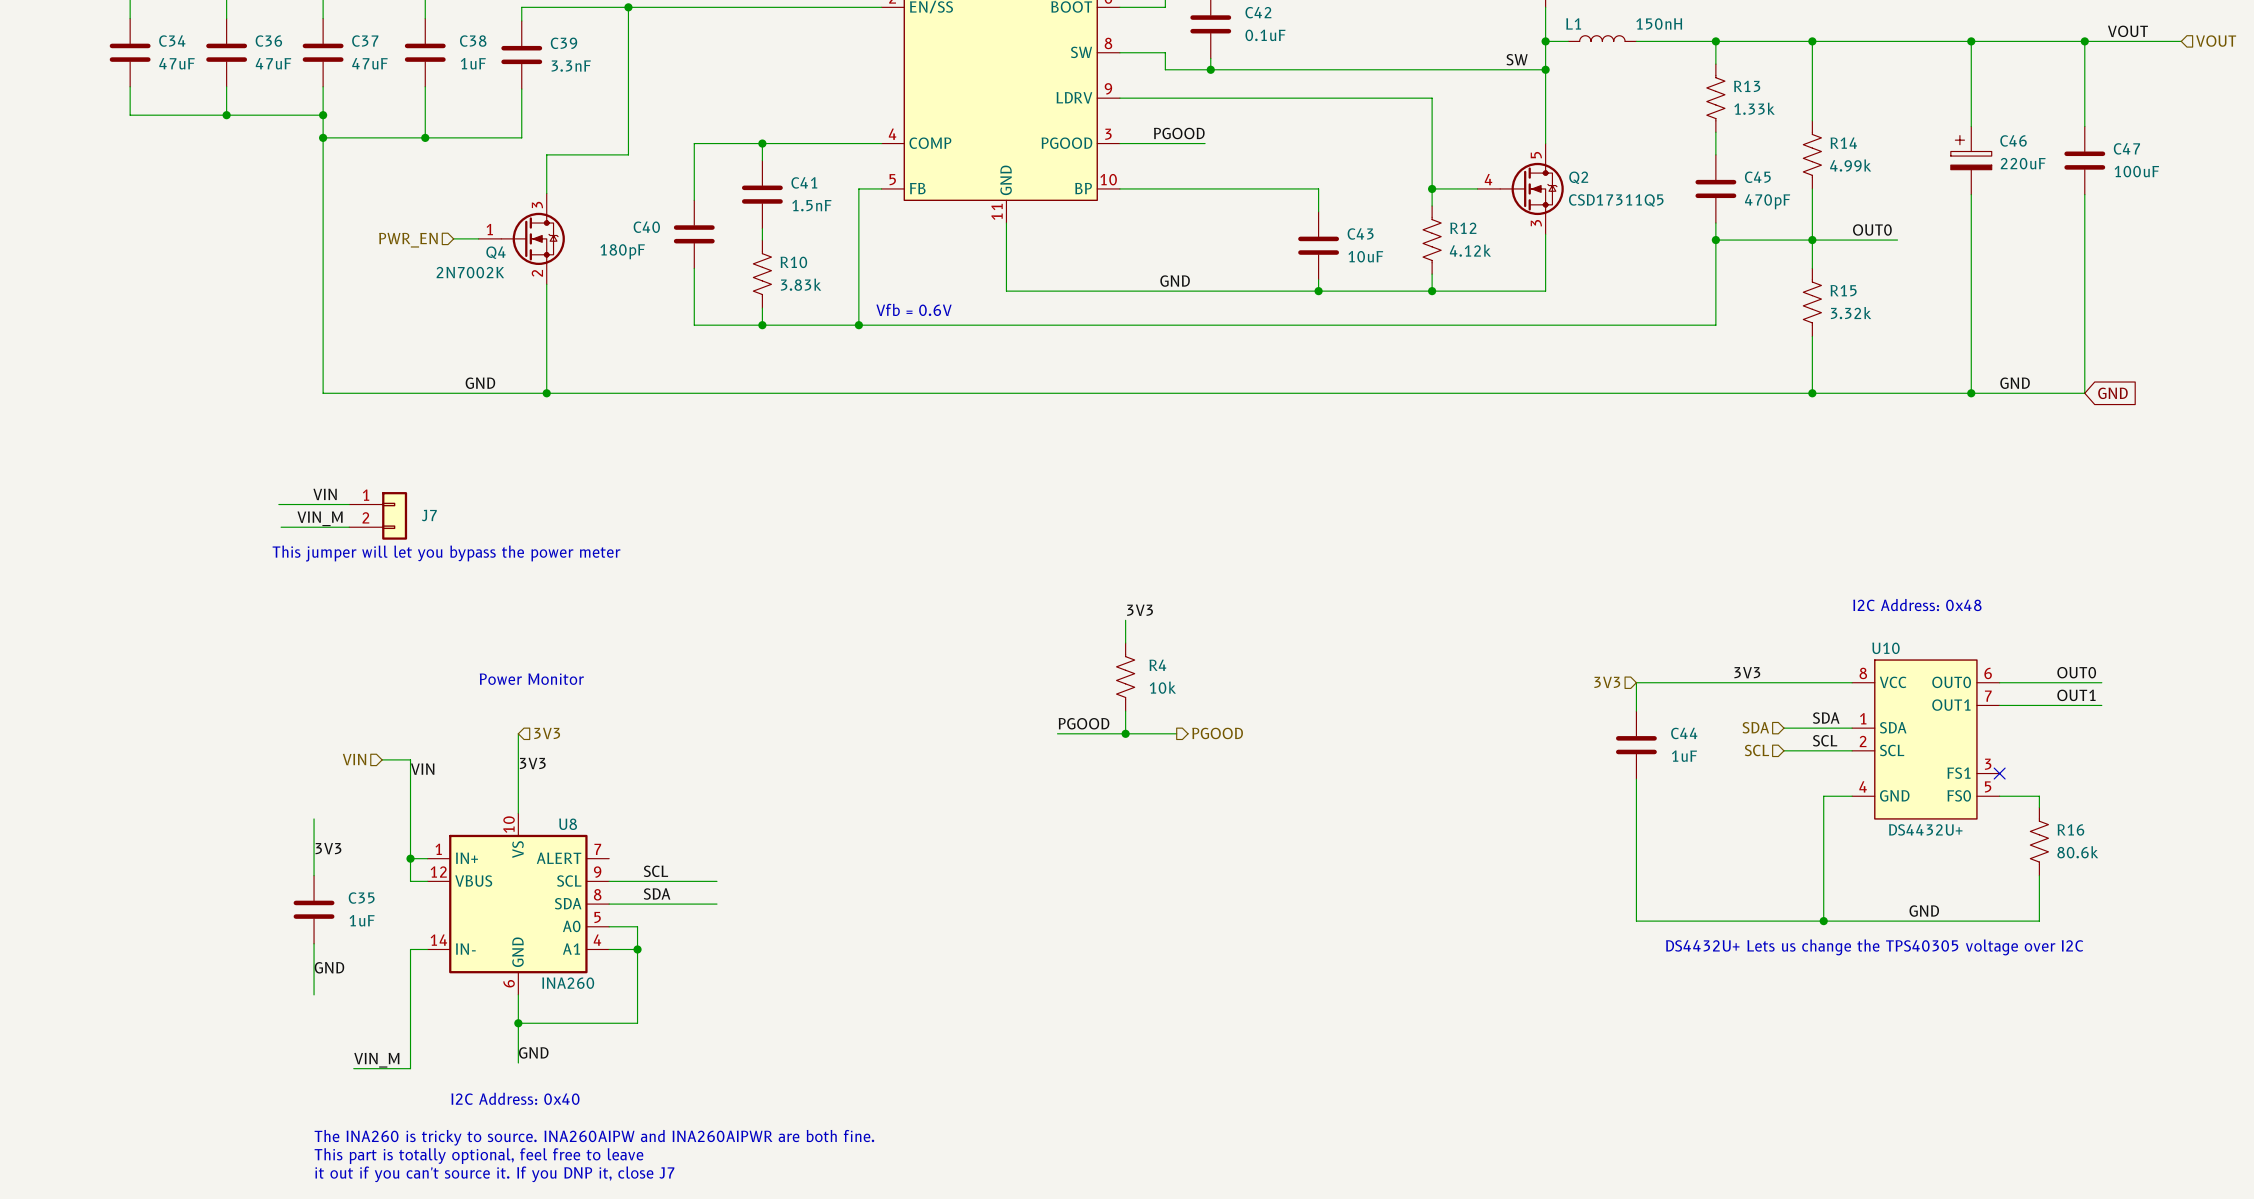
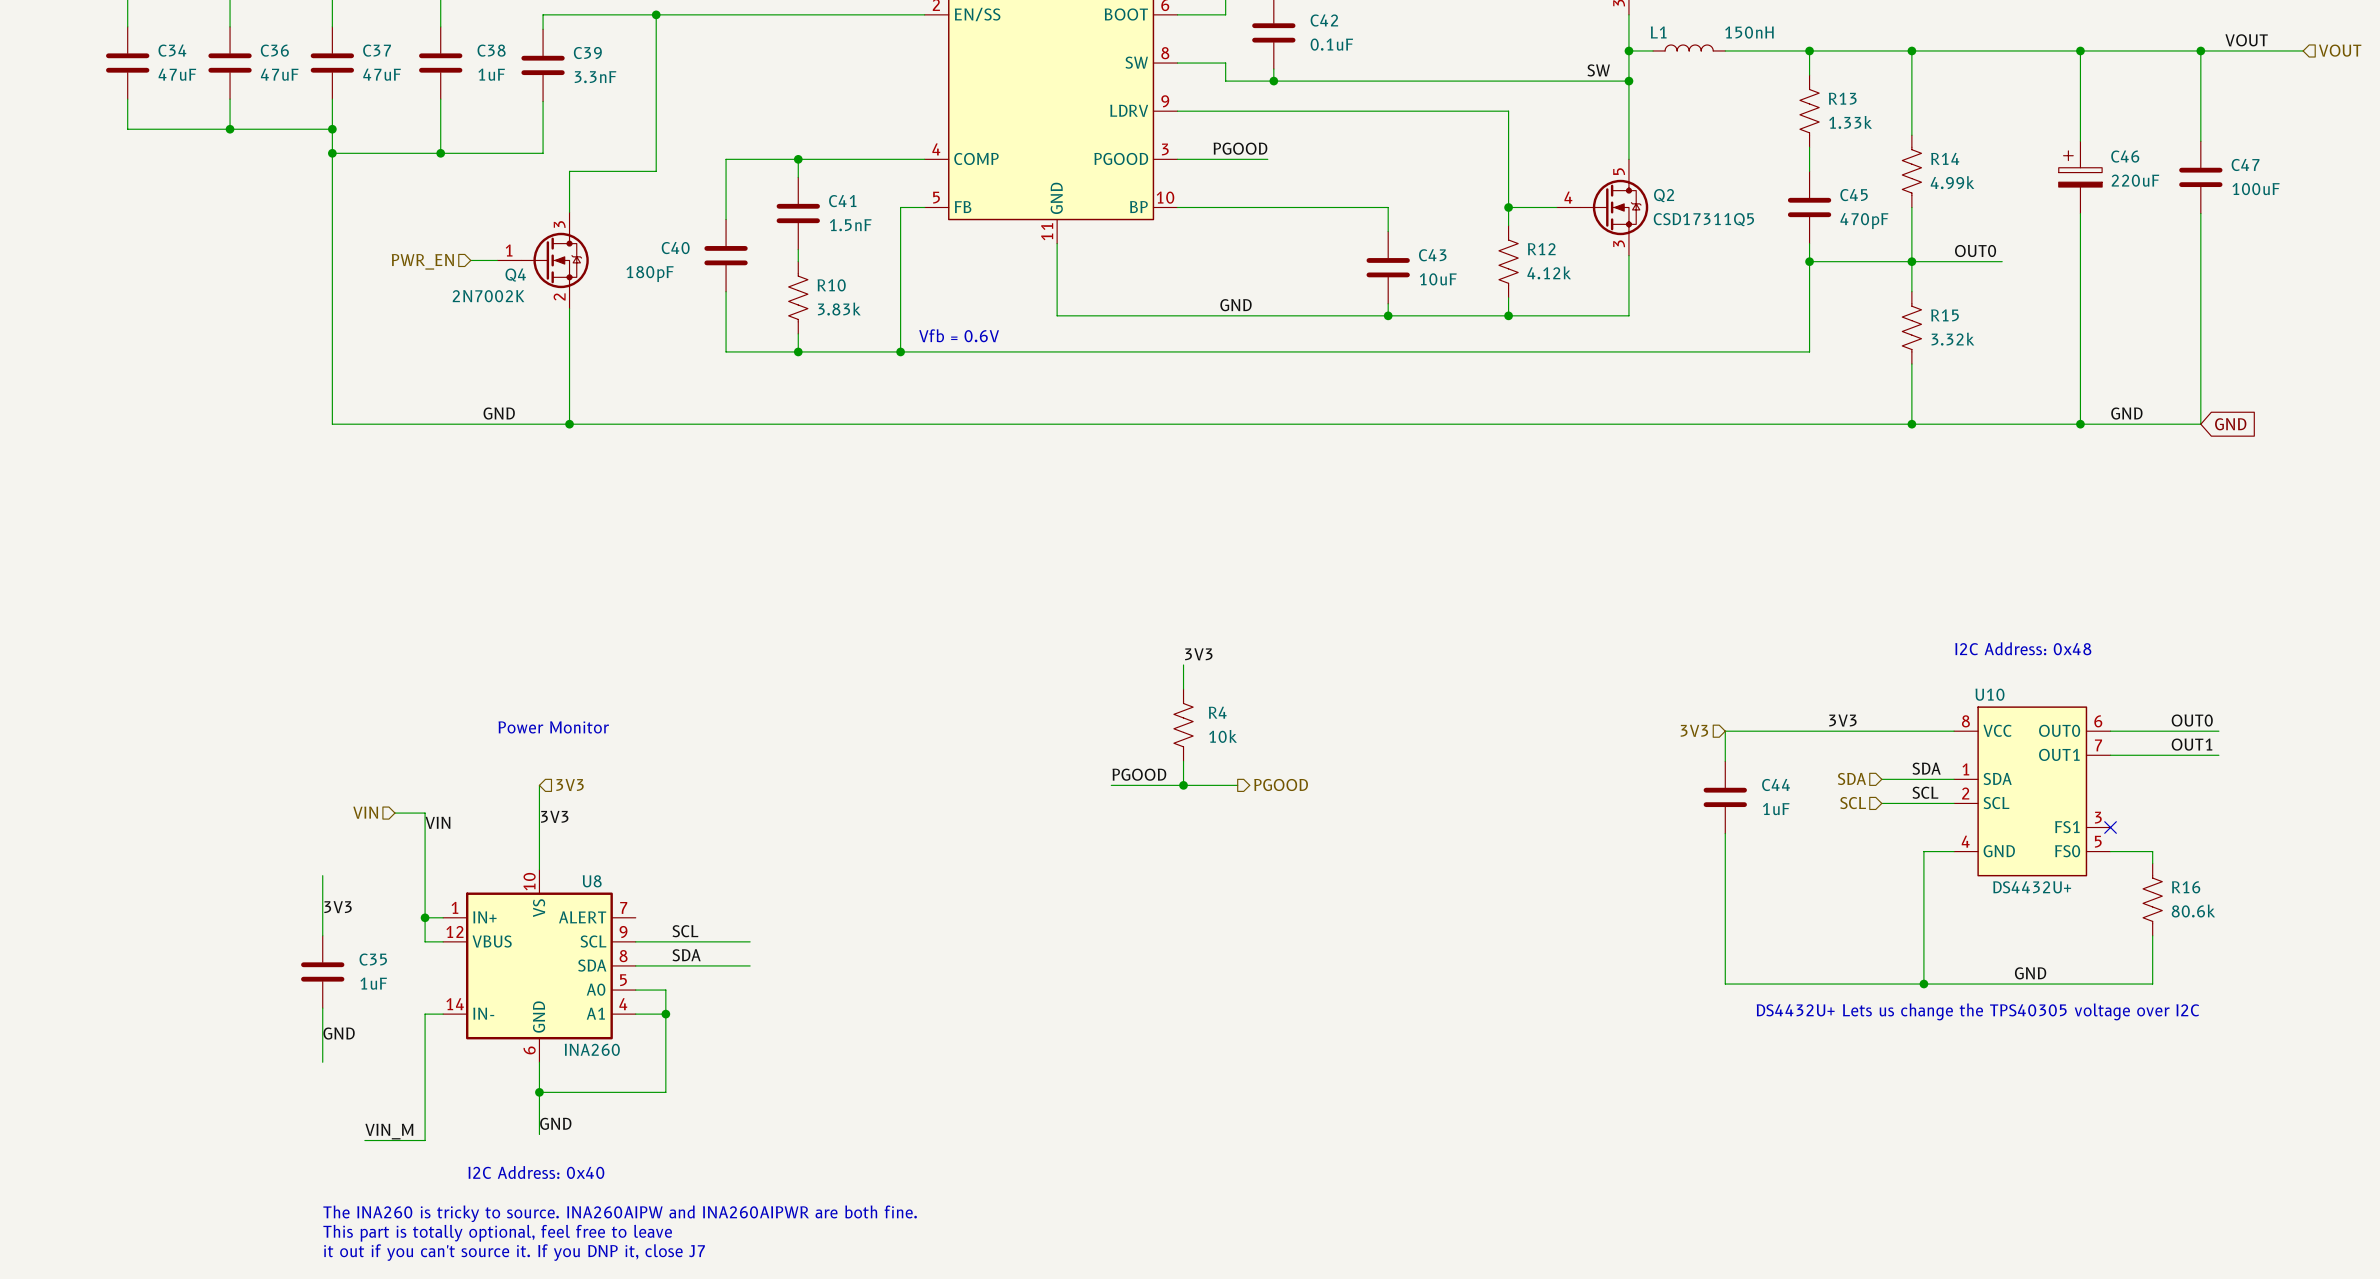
label: VIN (325, 494) -> none
wire: (278, 504) (349, 504) -> none
J7: (378, 515) -> none
label: VIN_M (320, 518) -> none
wire: (281, 527) (349, 527) -> none
text: This jumper will let you bypass the power meter (446, 553) -> none

